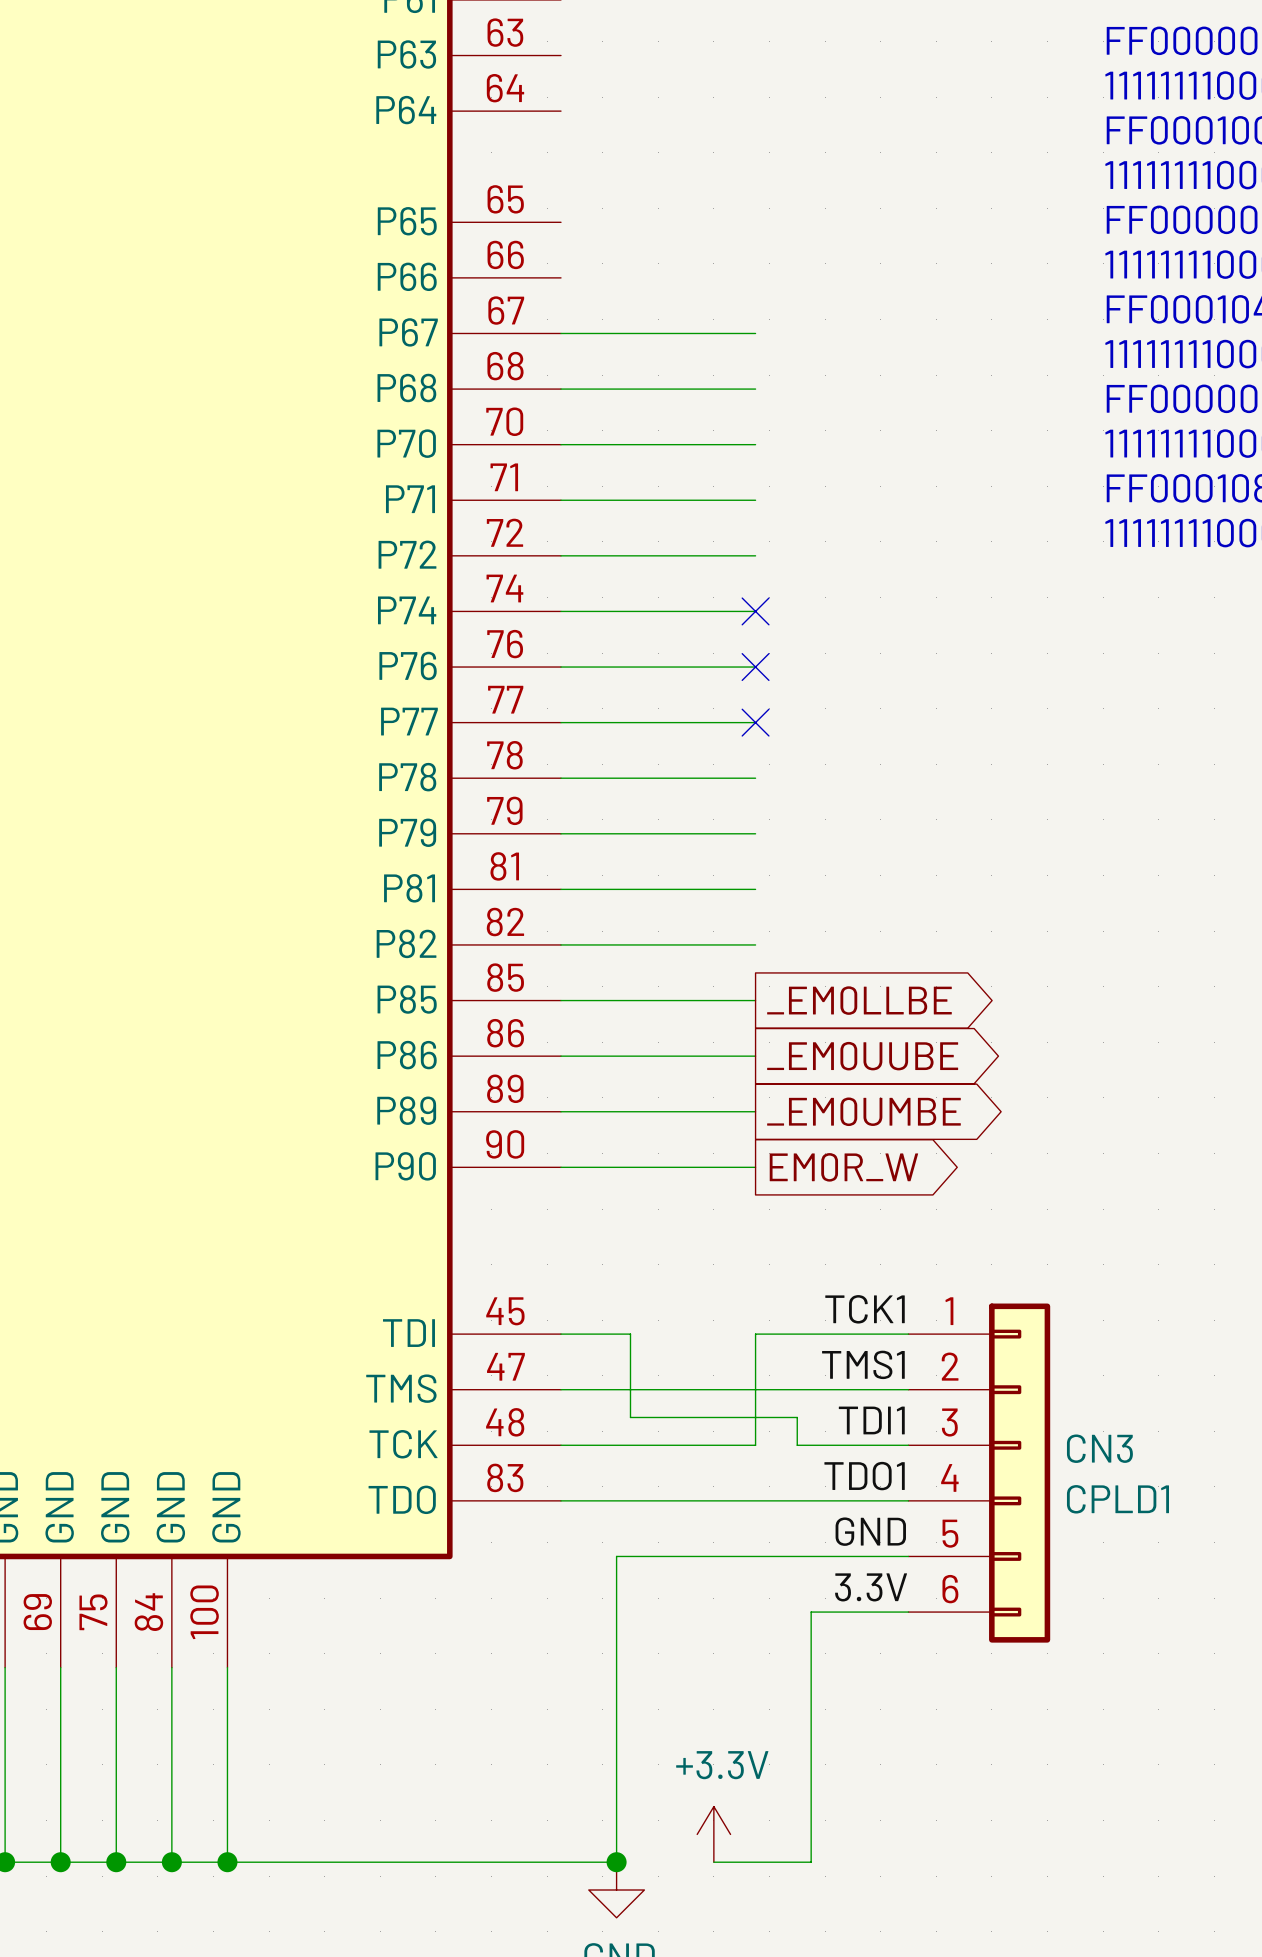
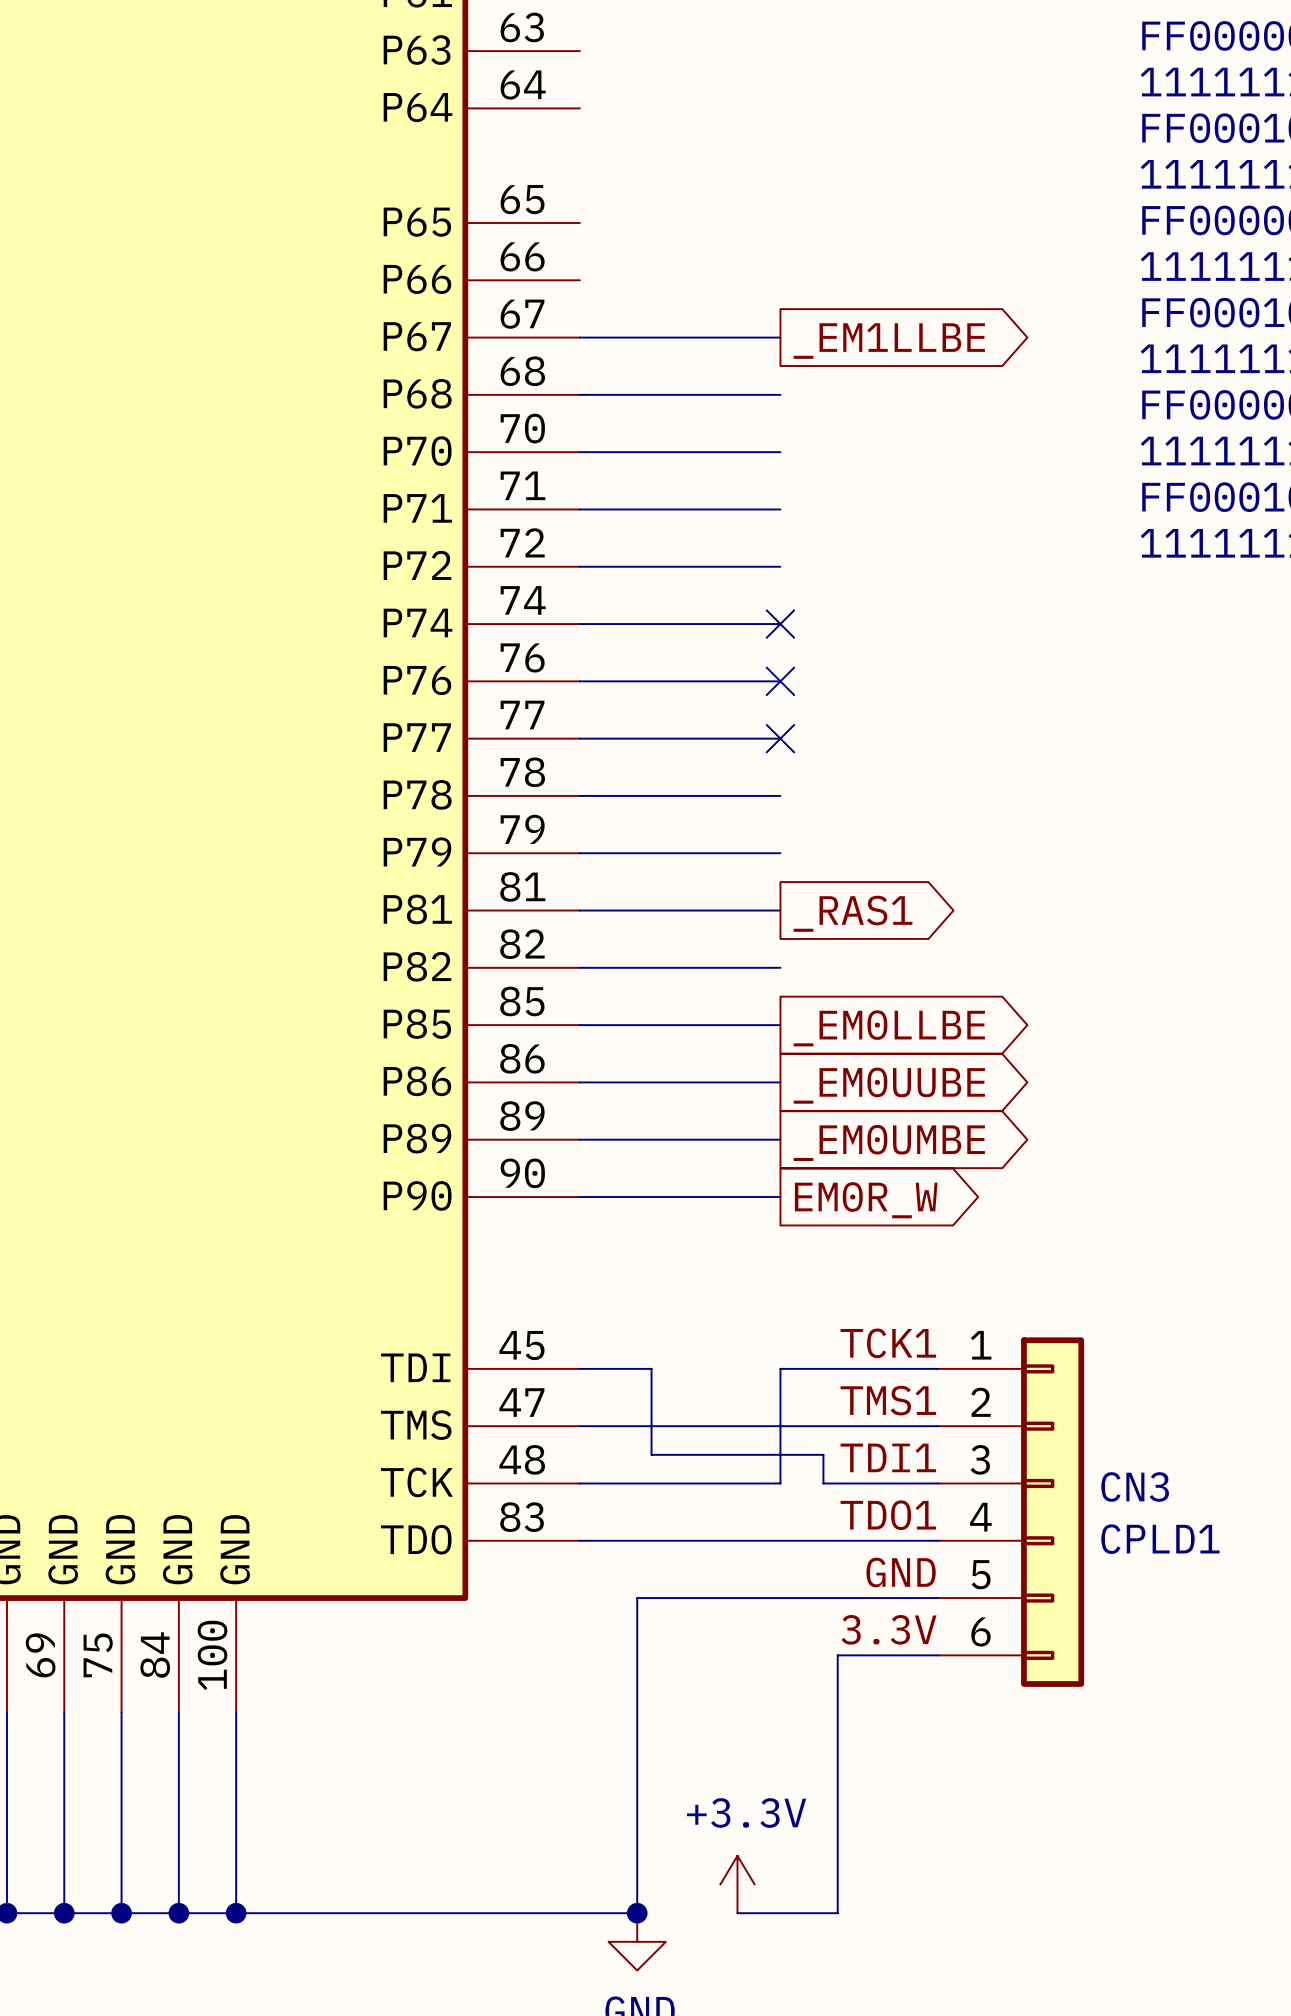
global label: none -> _EM1LLBE (889, 341)
global label: none -> _RAS1 (853, 913)

